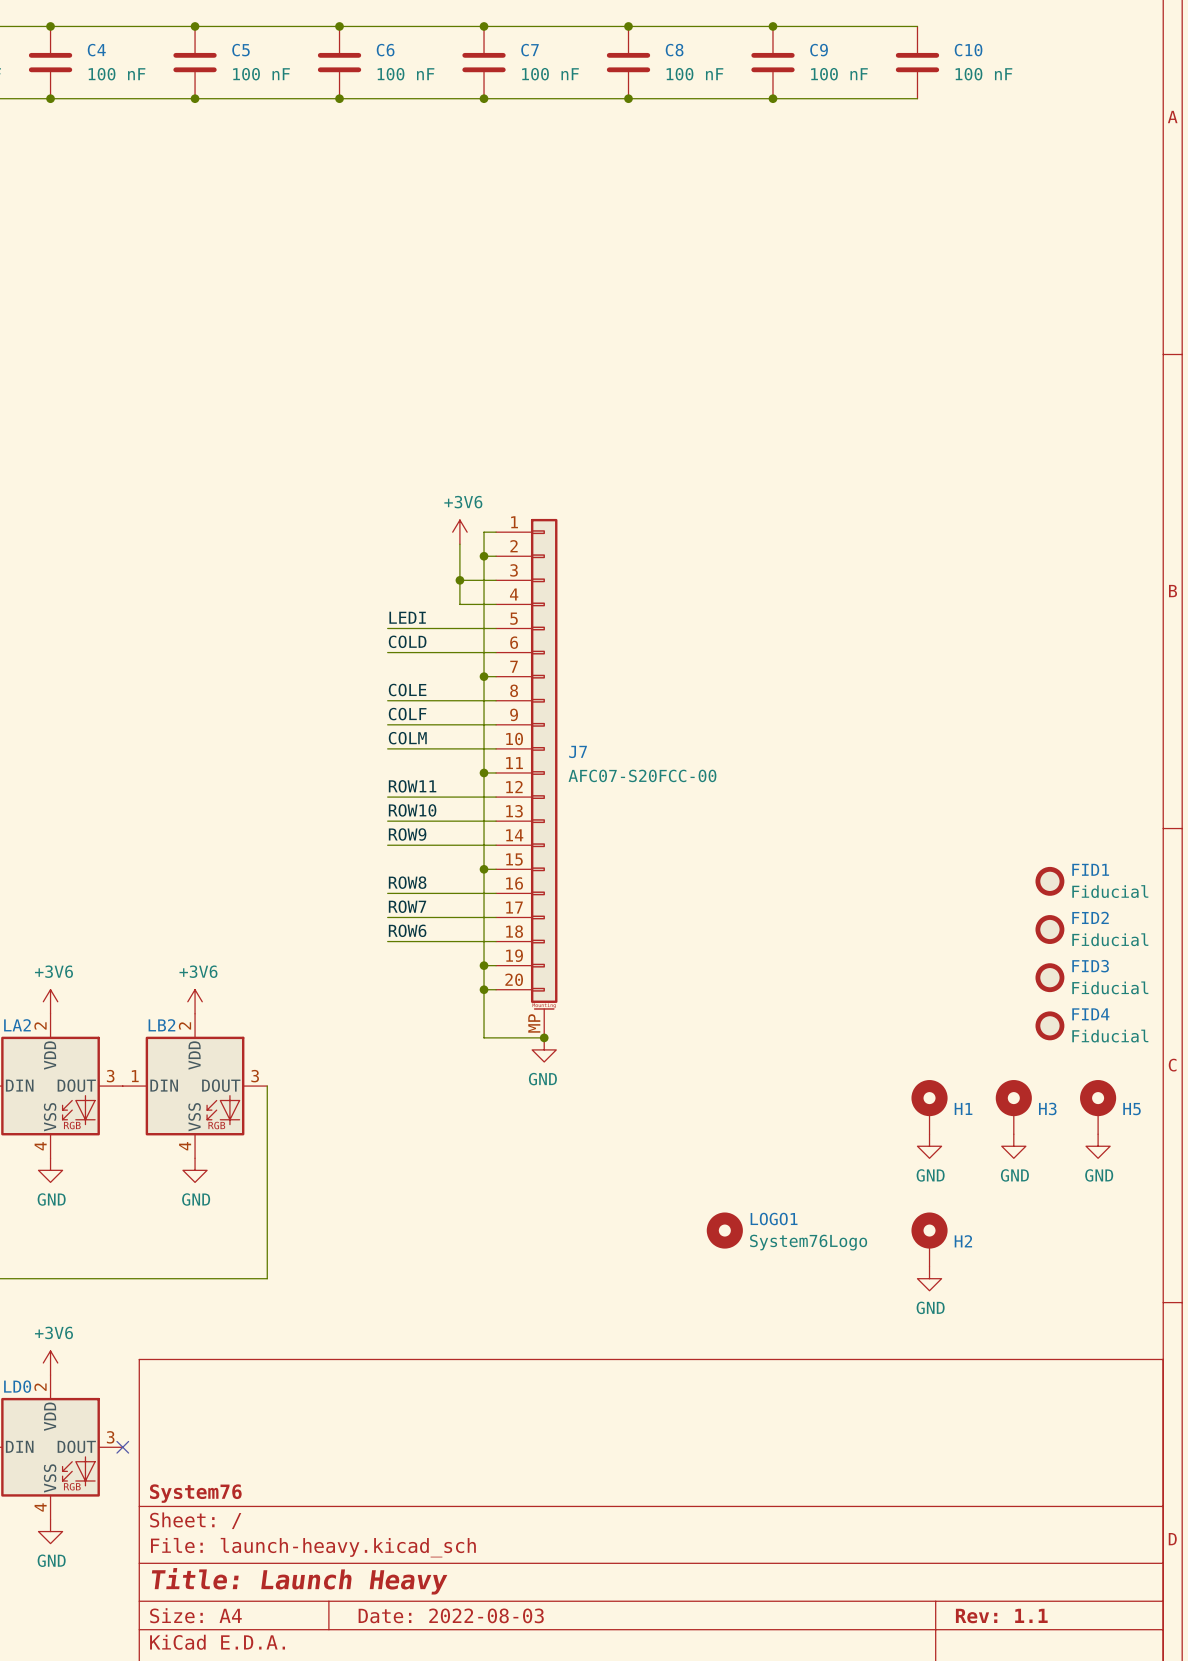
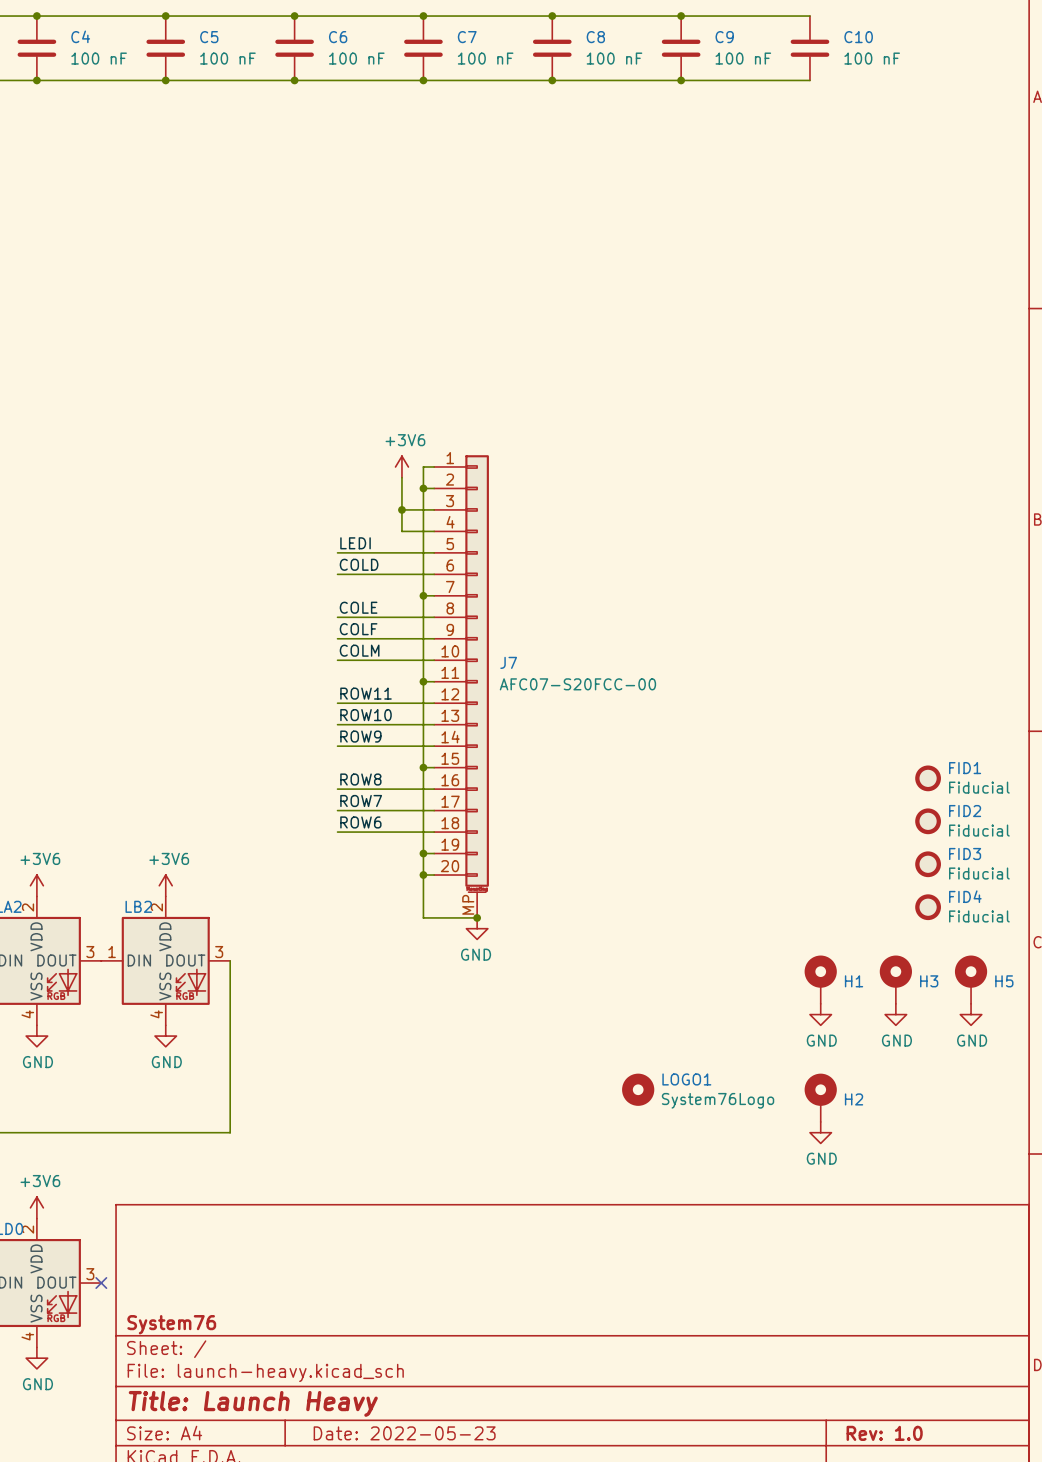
title block: Date: 2022-08-03 (451, 1615) -> Date: 2022-05-23 (404, 1433)
title block: Rev: 1.1 (1001, 1616) -> Rev: 1.0 (884, 1433)

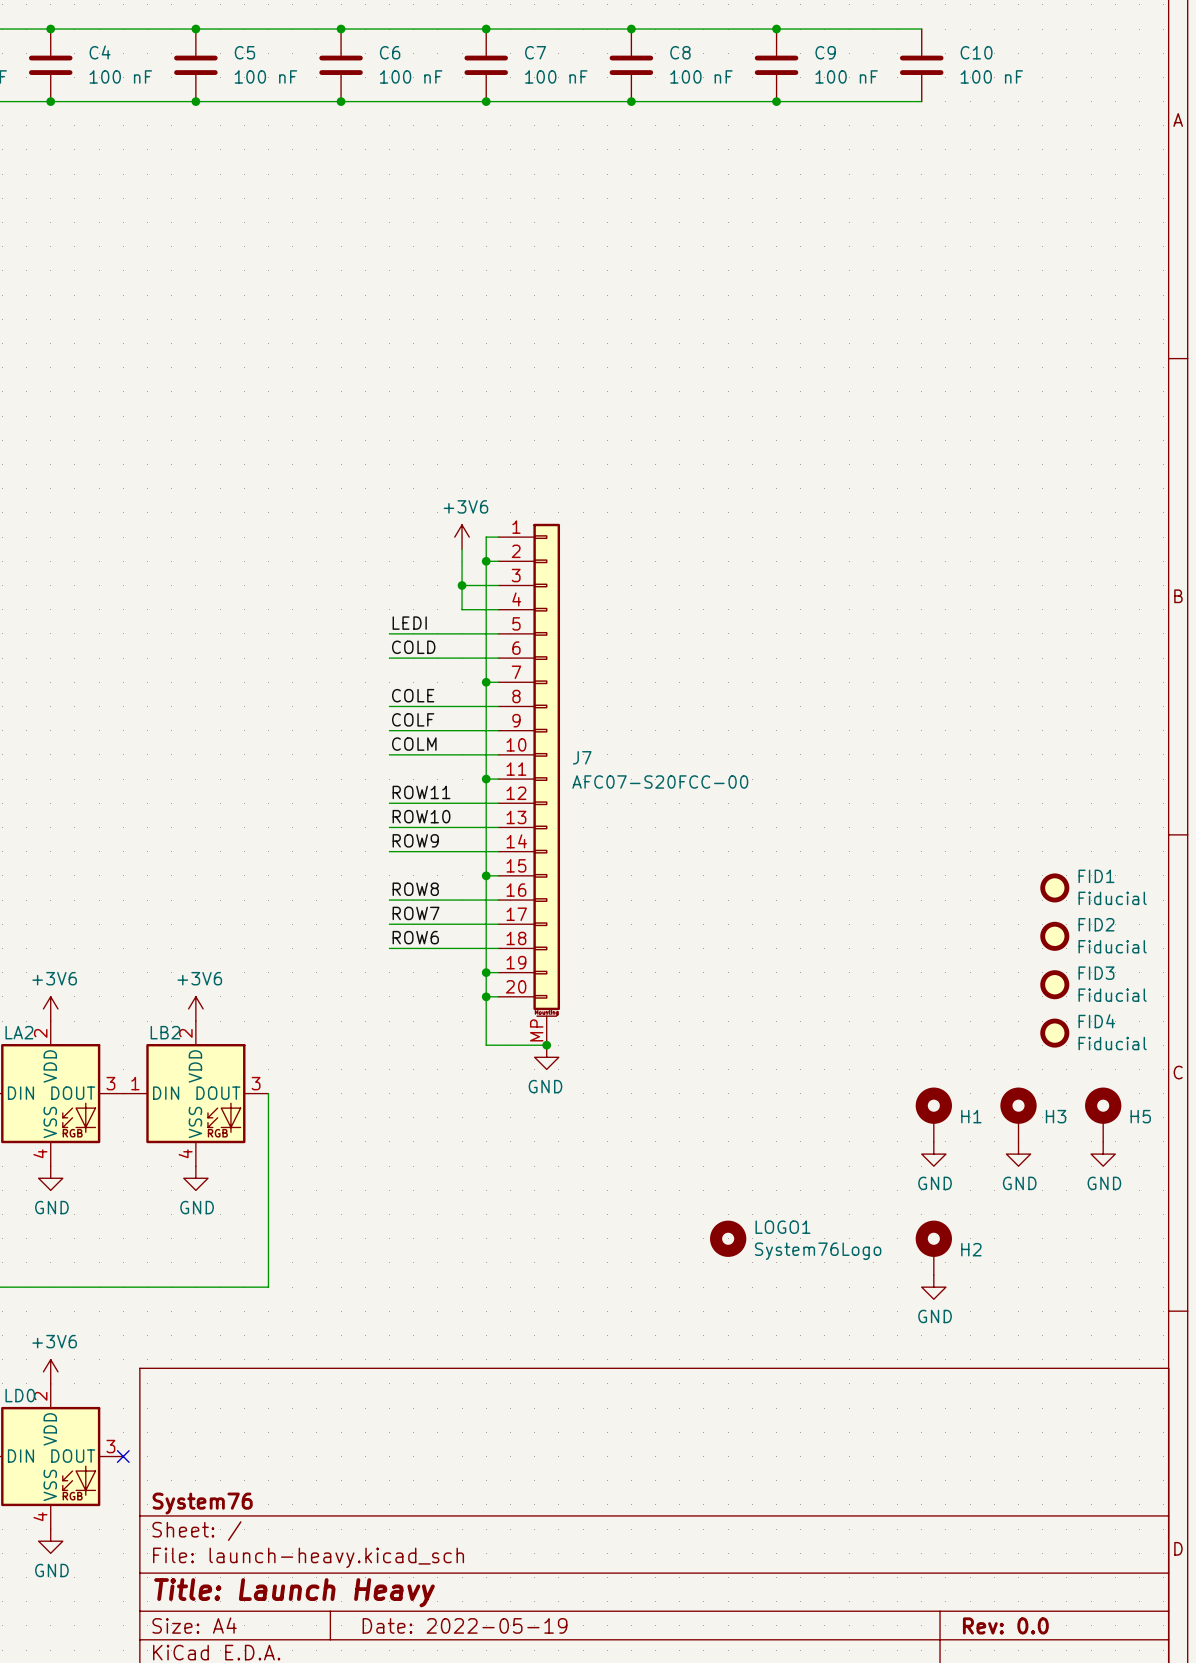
title block: Date: 2022-05-23 (404, 1433) -> Date: 2022-05-19 (465, 1625)
title block: Rev: 1.0 (884, 1433) -> Rev: 0.0 (1005, 1625)

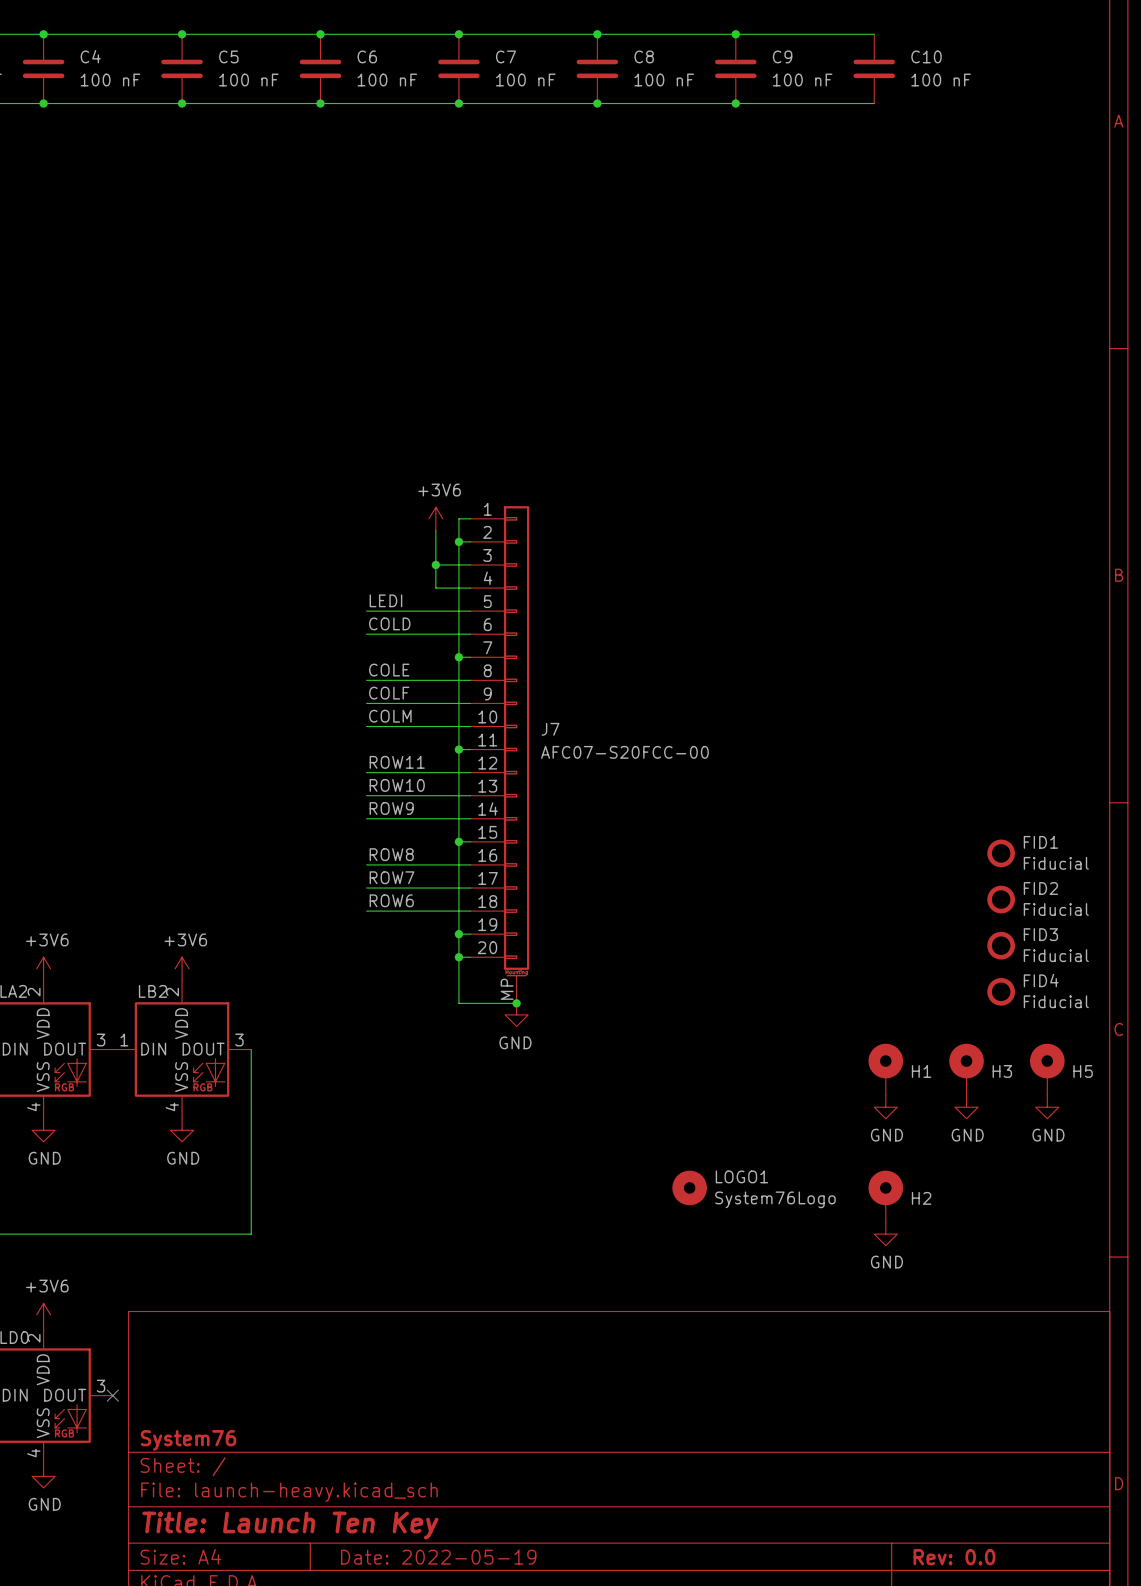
title block: Title: Launch Heavy (294, 1592) -> Title: Launch Ten Key (290, 1525)

